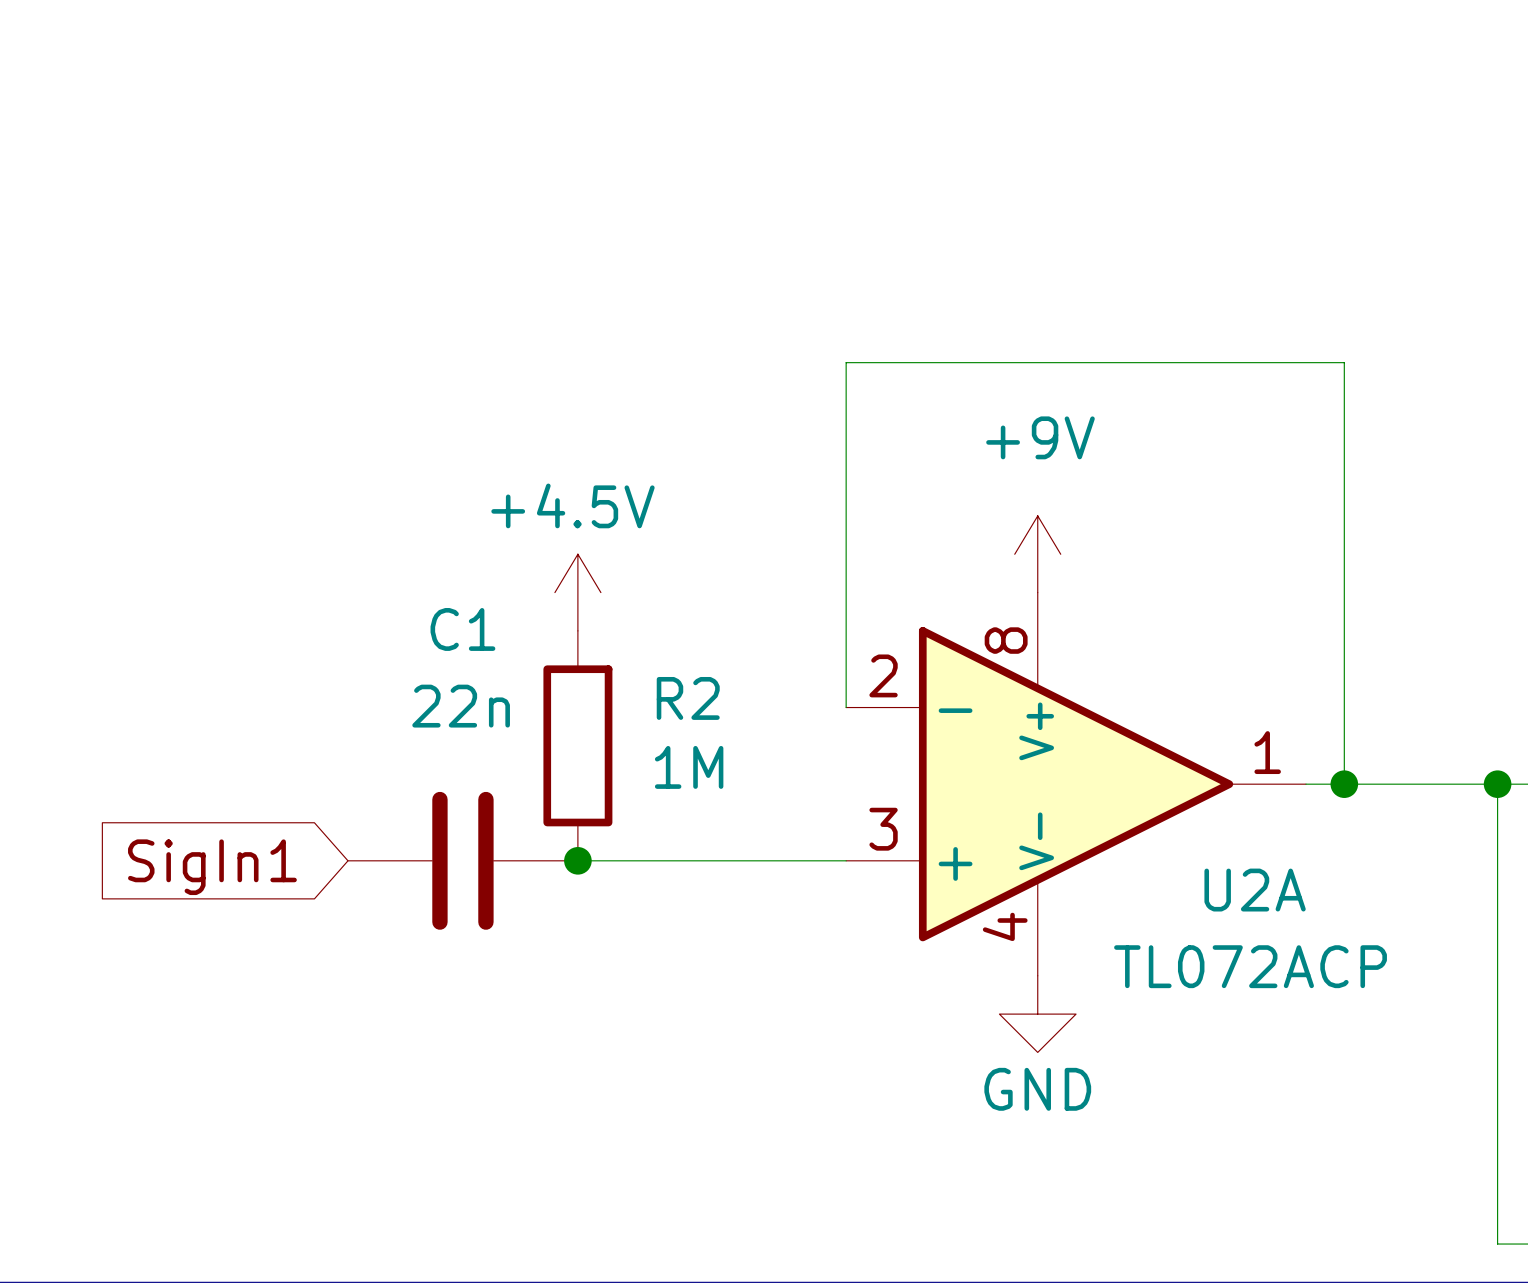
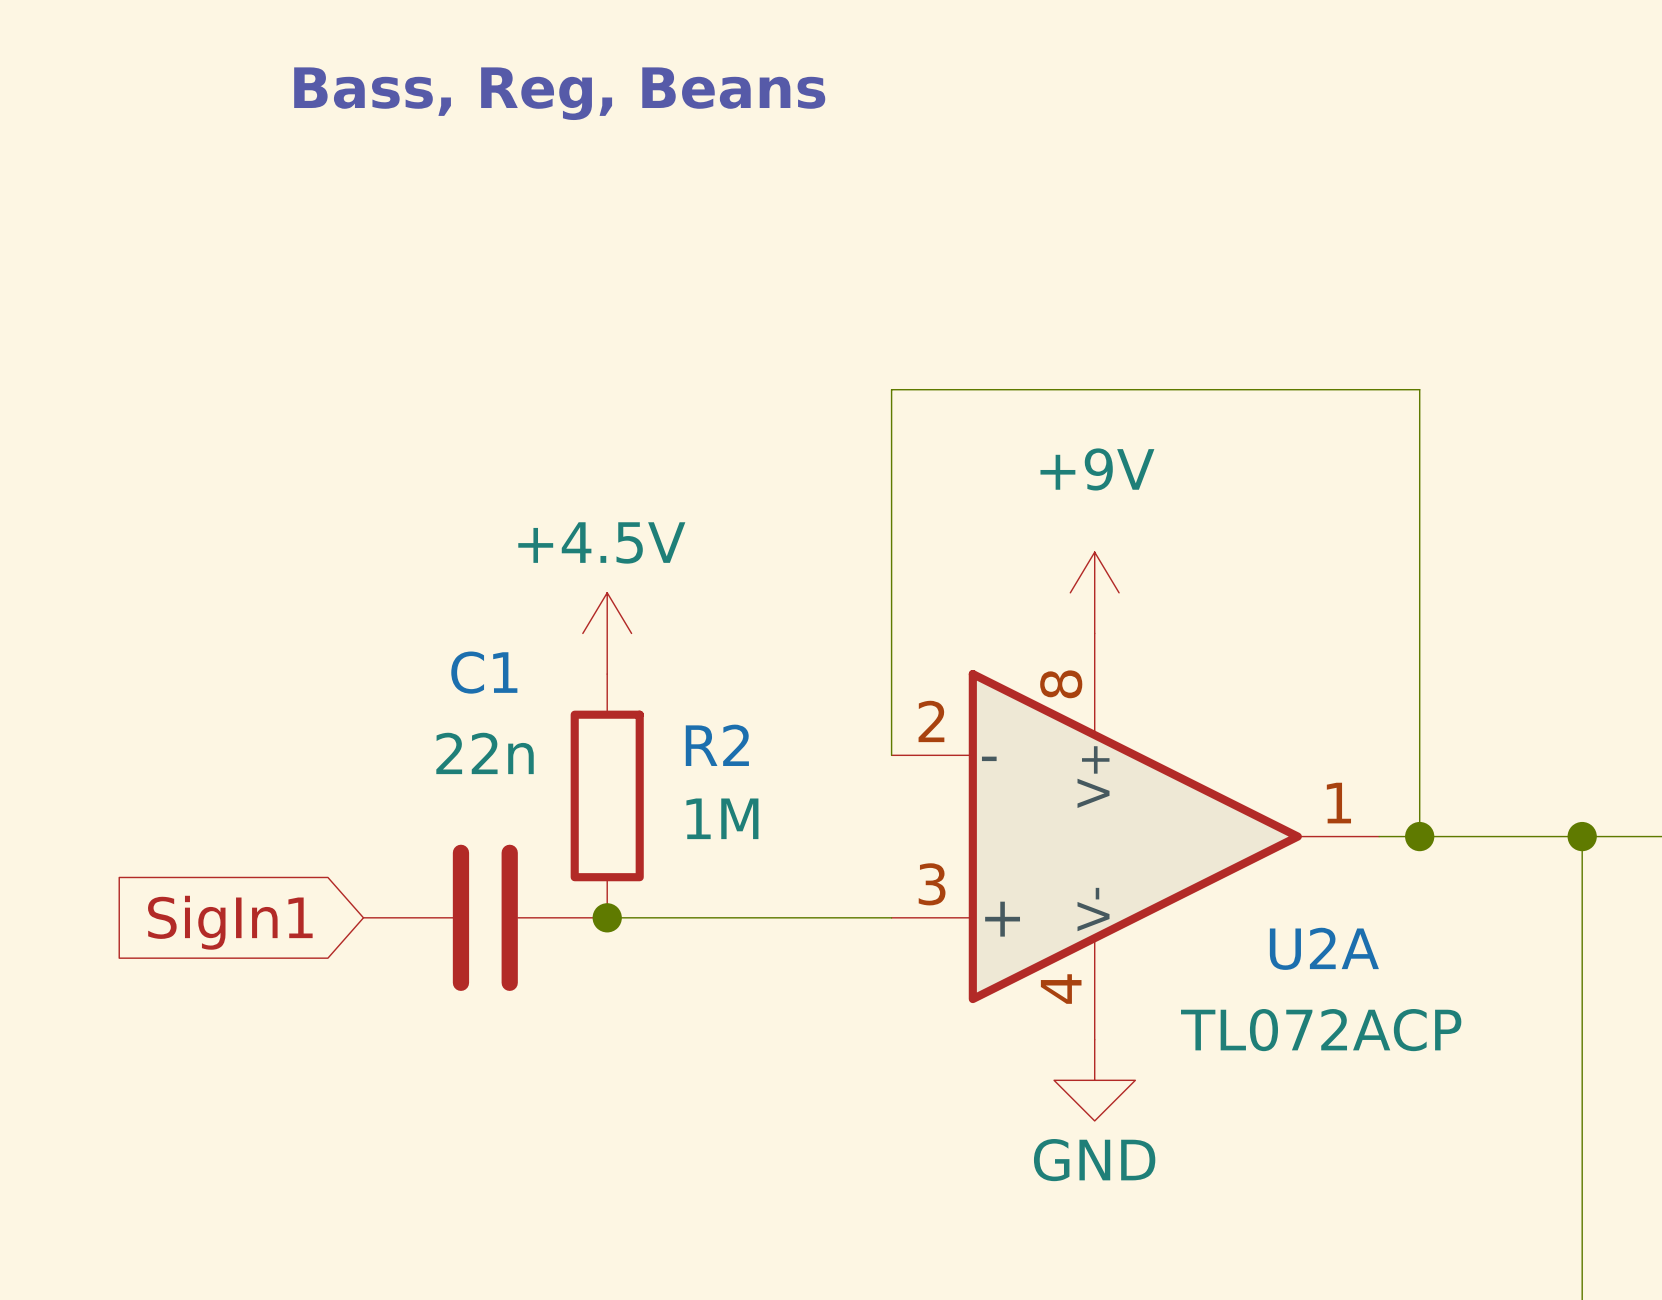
text: none -> Bass, Reg, Beans (559, 93)

